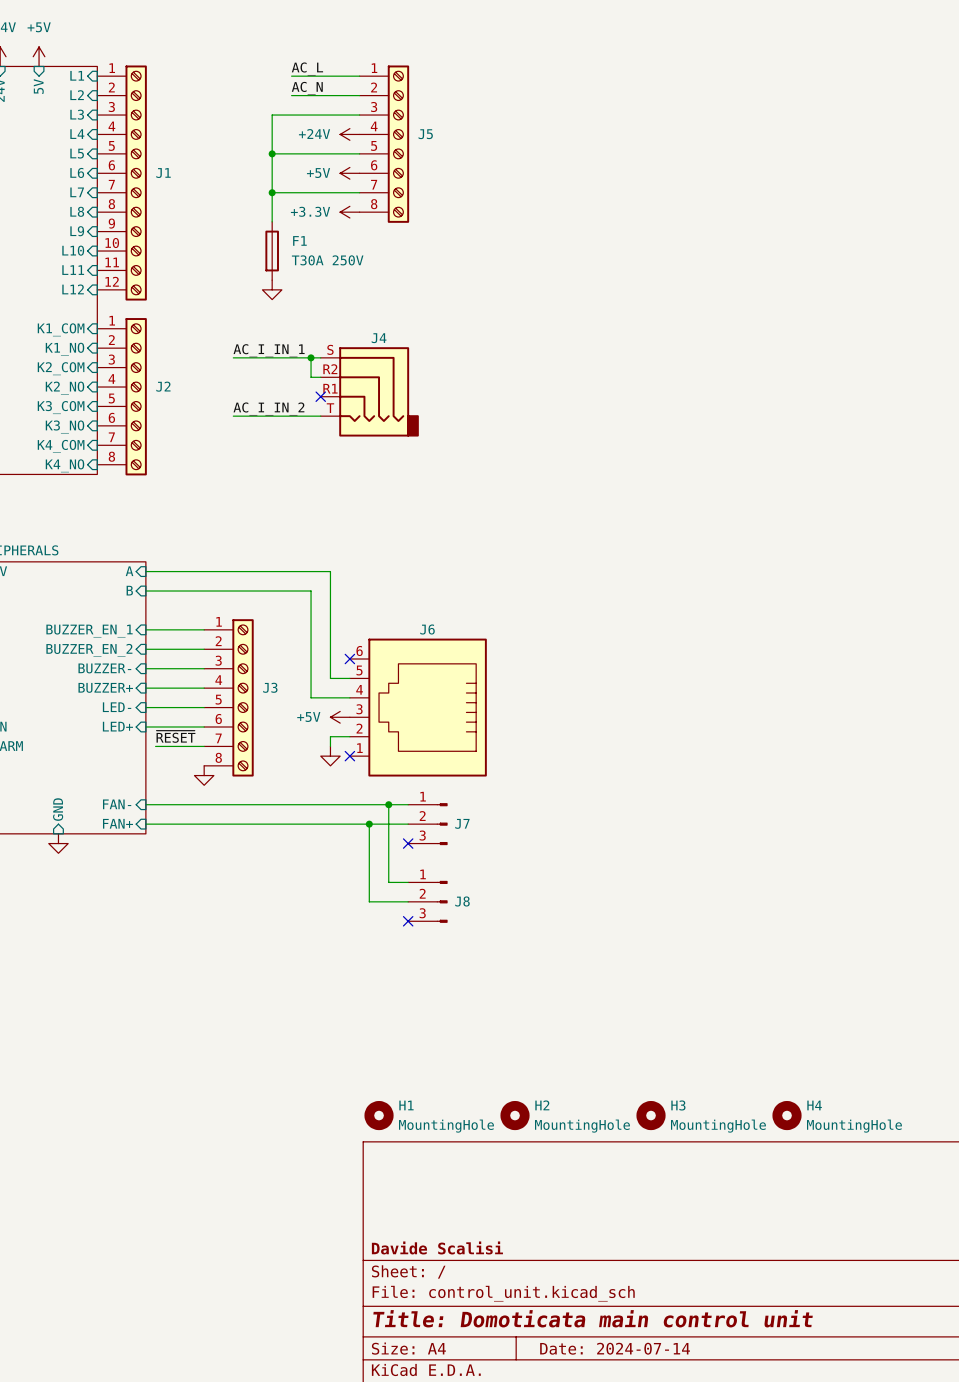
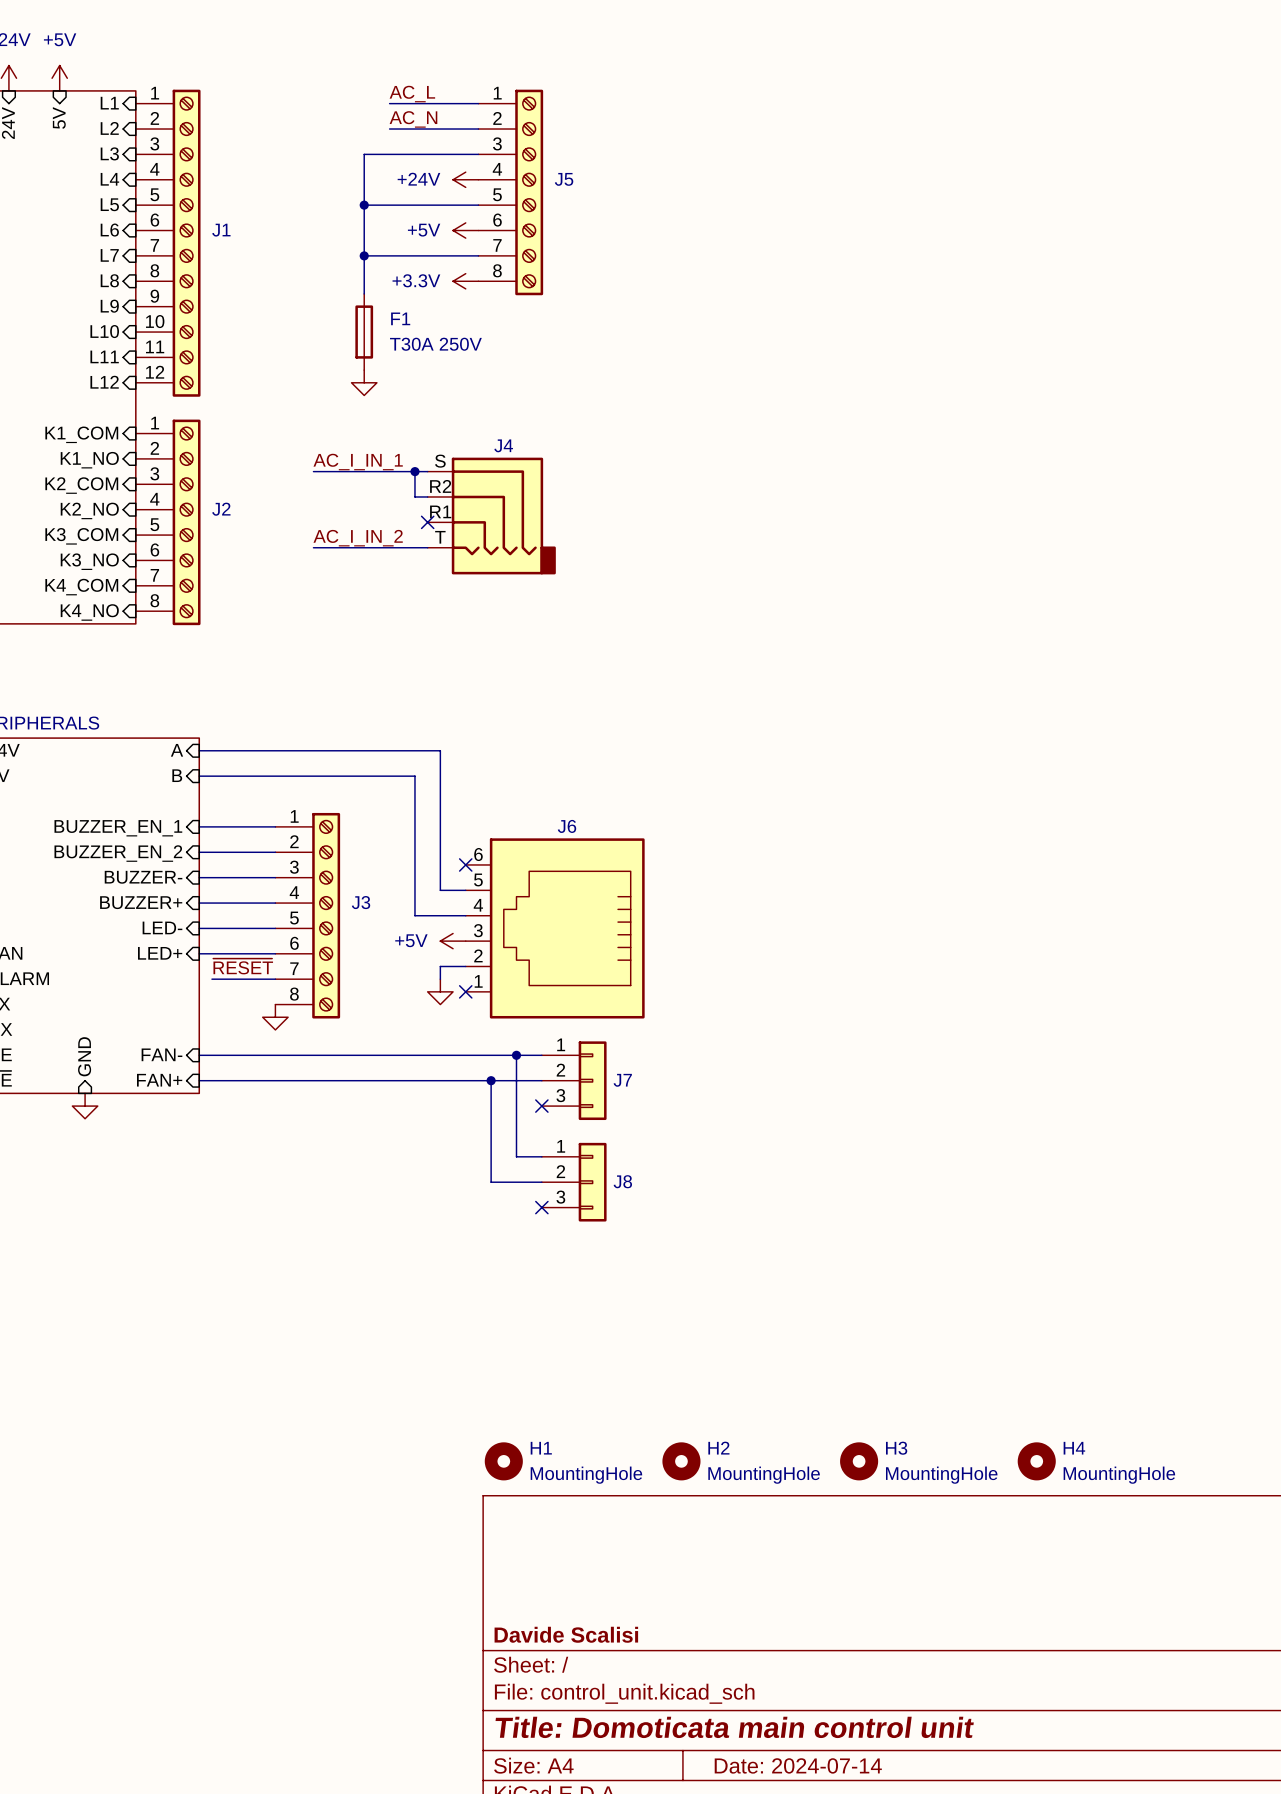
J7 symbol: [408, 803, 448, 846] -> [541, 1041, 607, 1121]
J8 symbol: [408, 880, 448, 923] -> [541, 1142, 607, 1222]

